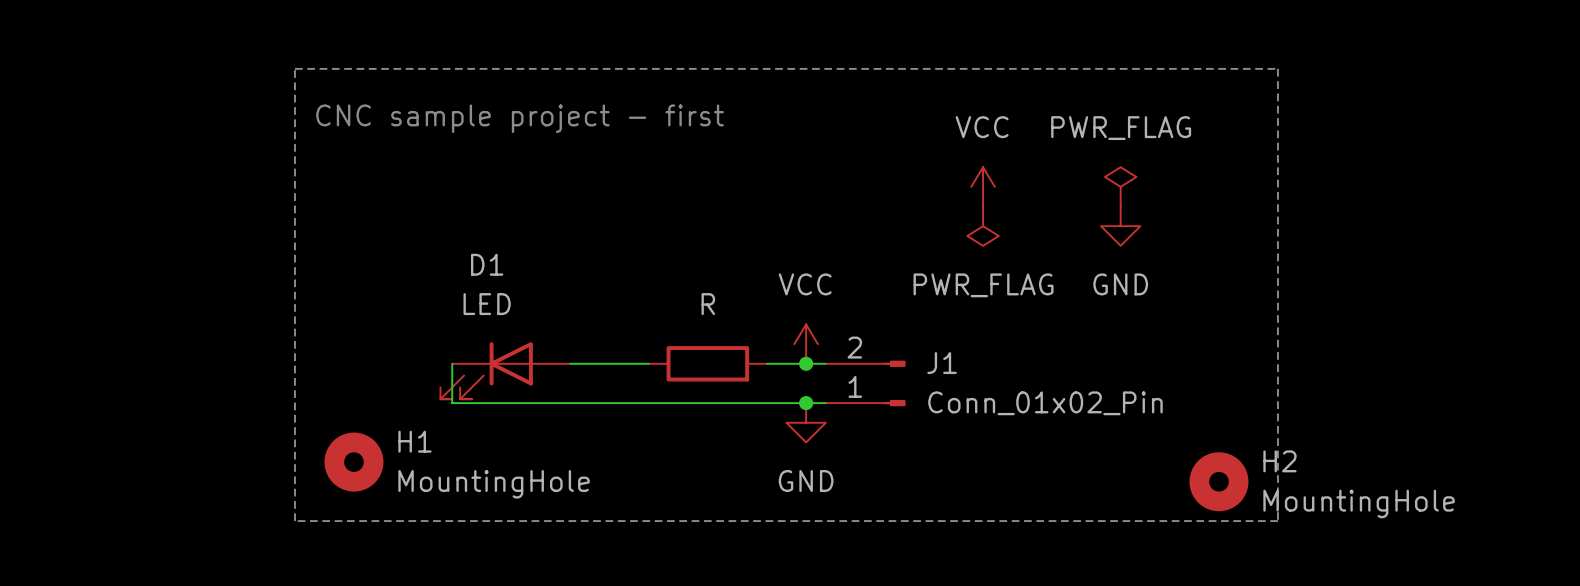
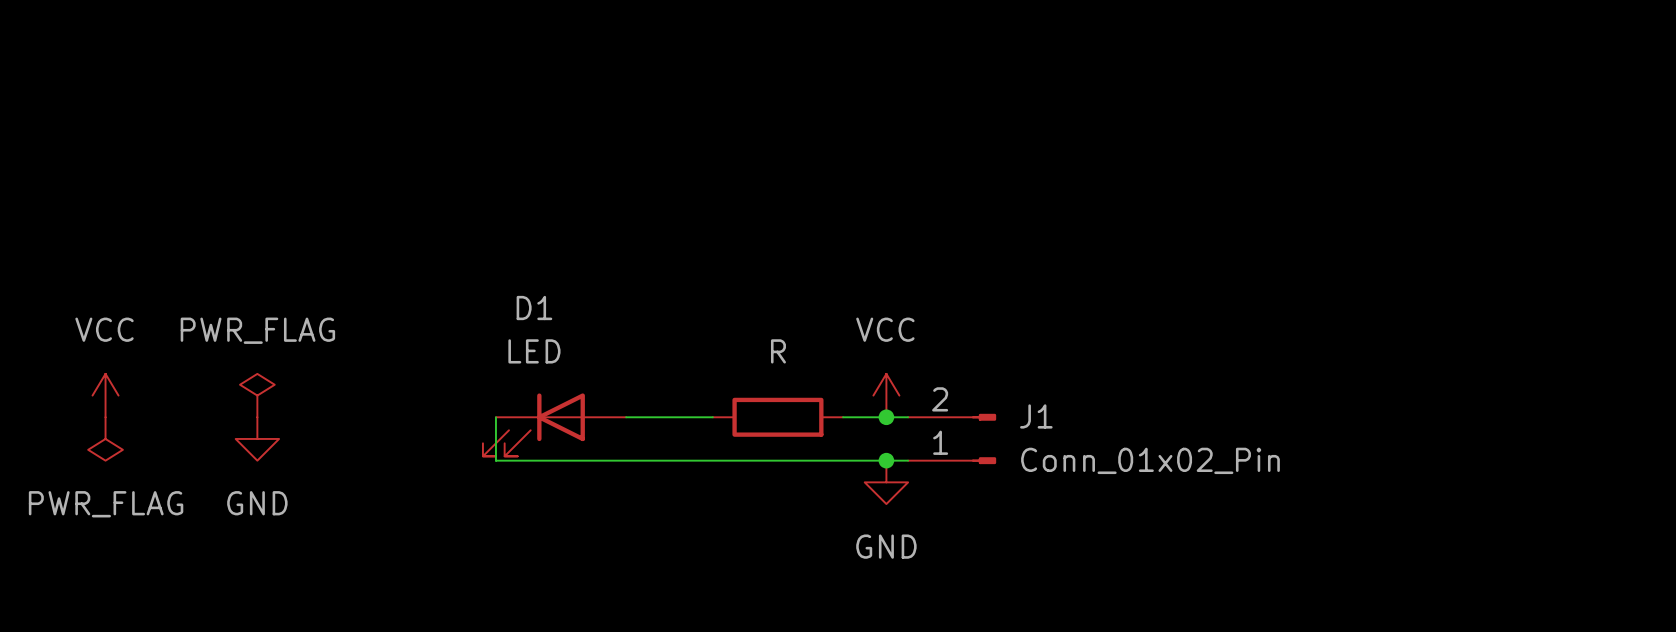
line: (294, 68) (1277, 68) (1277, 521) (294, 521) (294, 68) -> none
text: CNC sample project - first (520, 118) -> none
power symbol: VCC (983, 186) -> none
power symbol: PWR_FLAG (1120, 186) -> none
power symbol: PWR_FLAG (983, 226) -> none
power symbol: GND (1120, 226) -> none
power symbol: none -> VCC (105, 395)
power symbol: none -> PWR_FLAG (257, 395)
power symbol: none -> PWR_FLAG (105, 438)
power symbol: none -> GND (257, 438)
H1: MountingHole (353, 462) -> none
H2: MountingHole (1218, 481) -> none

